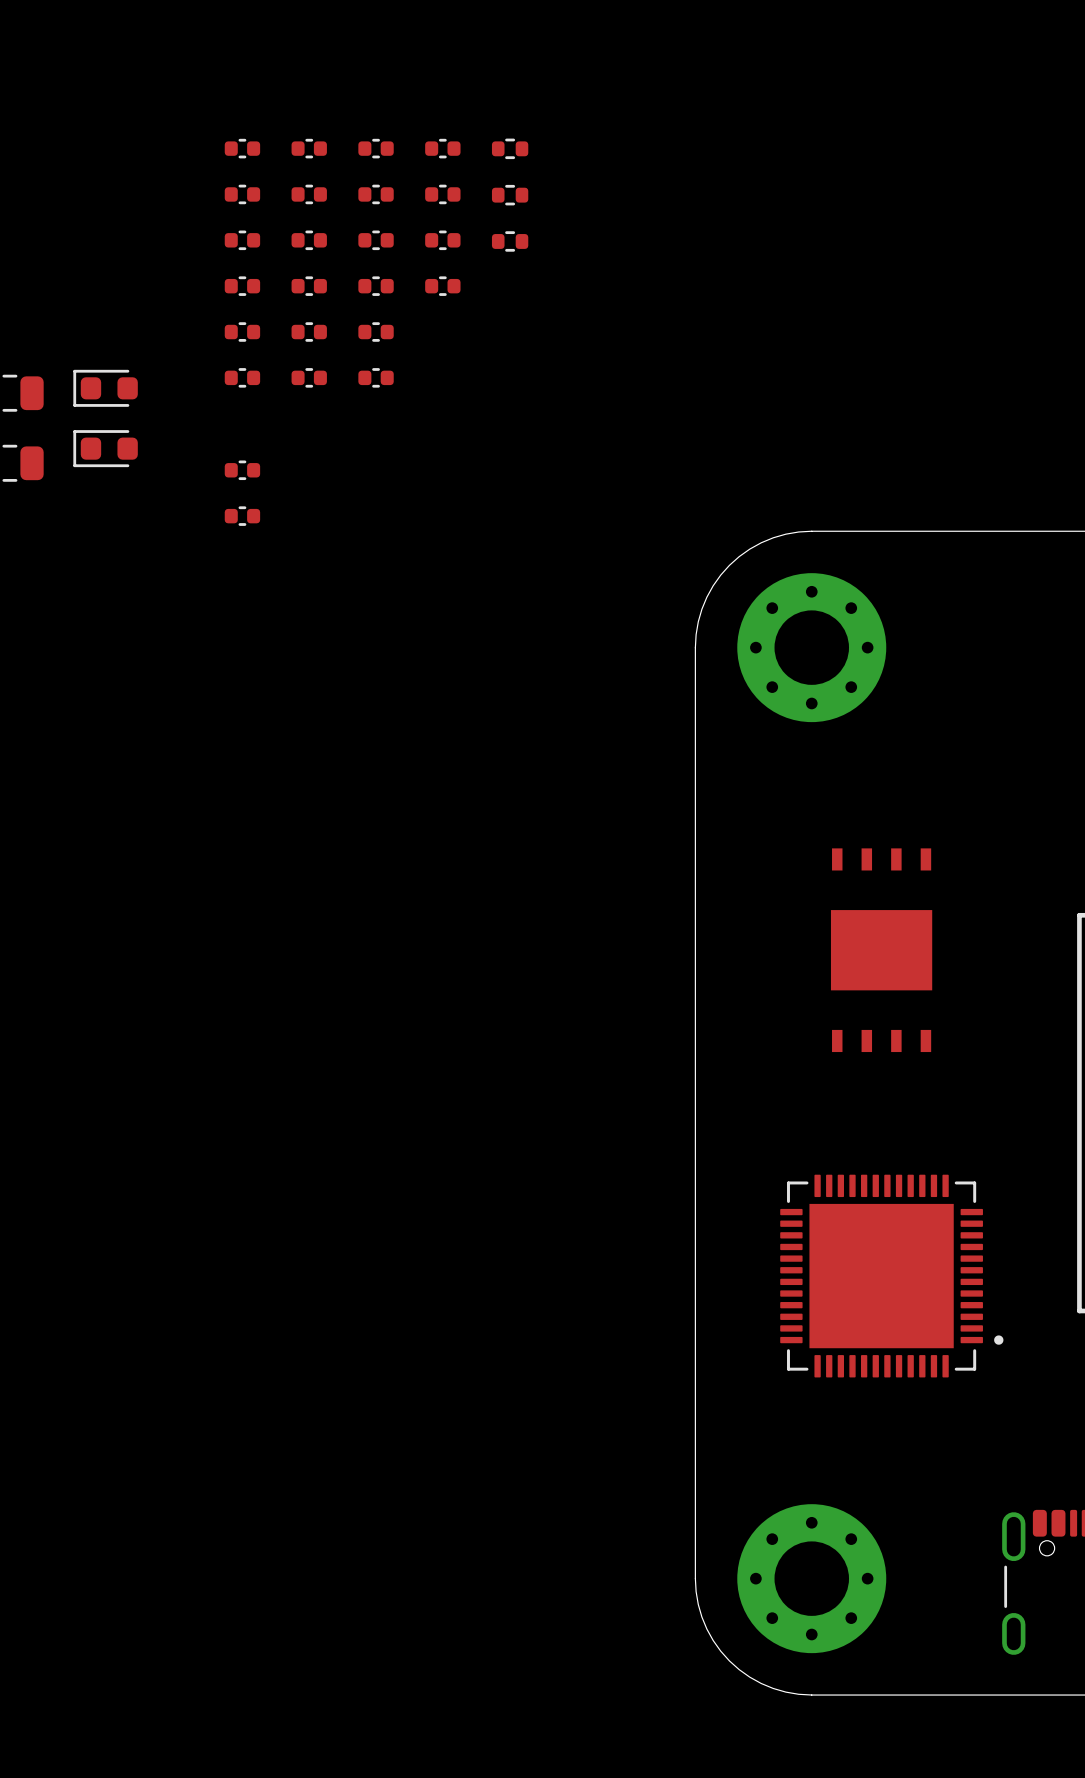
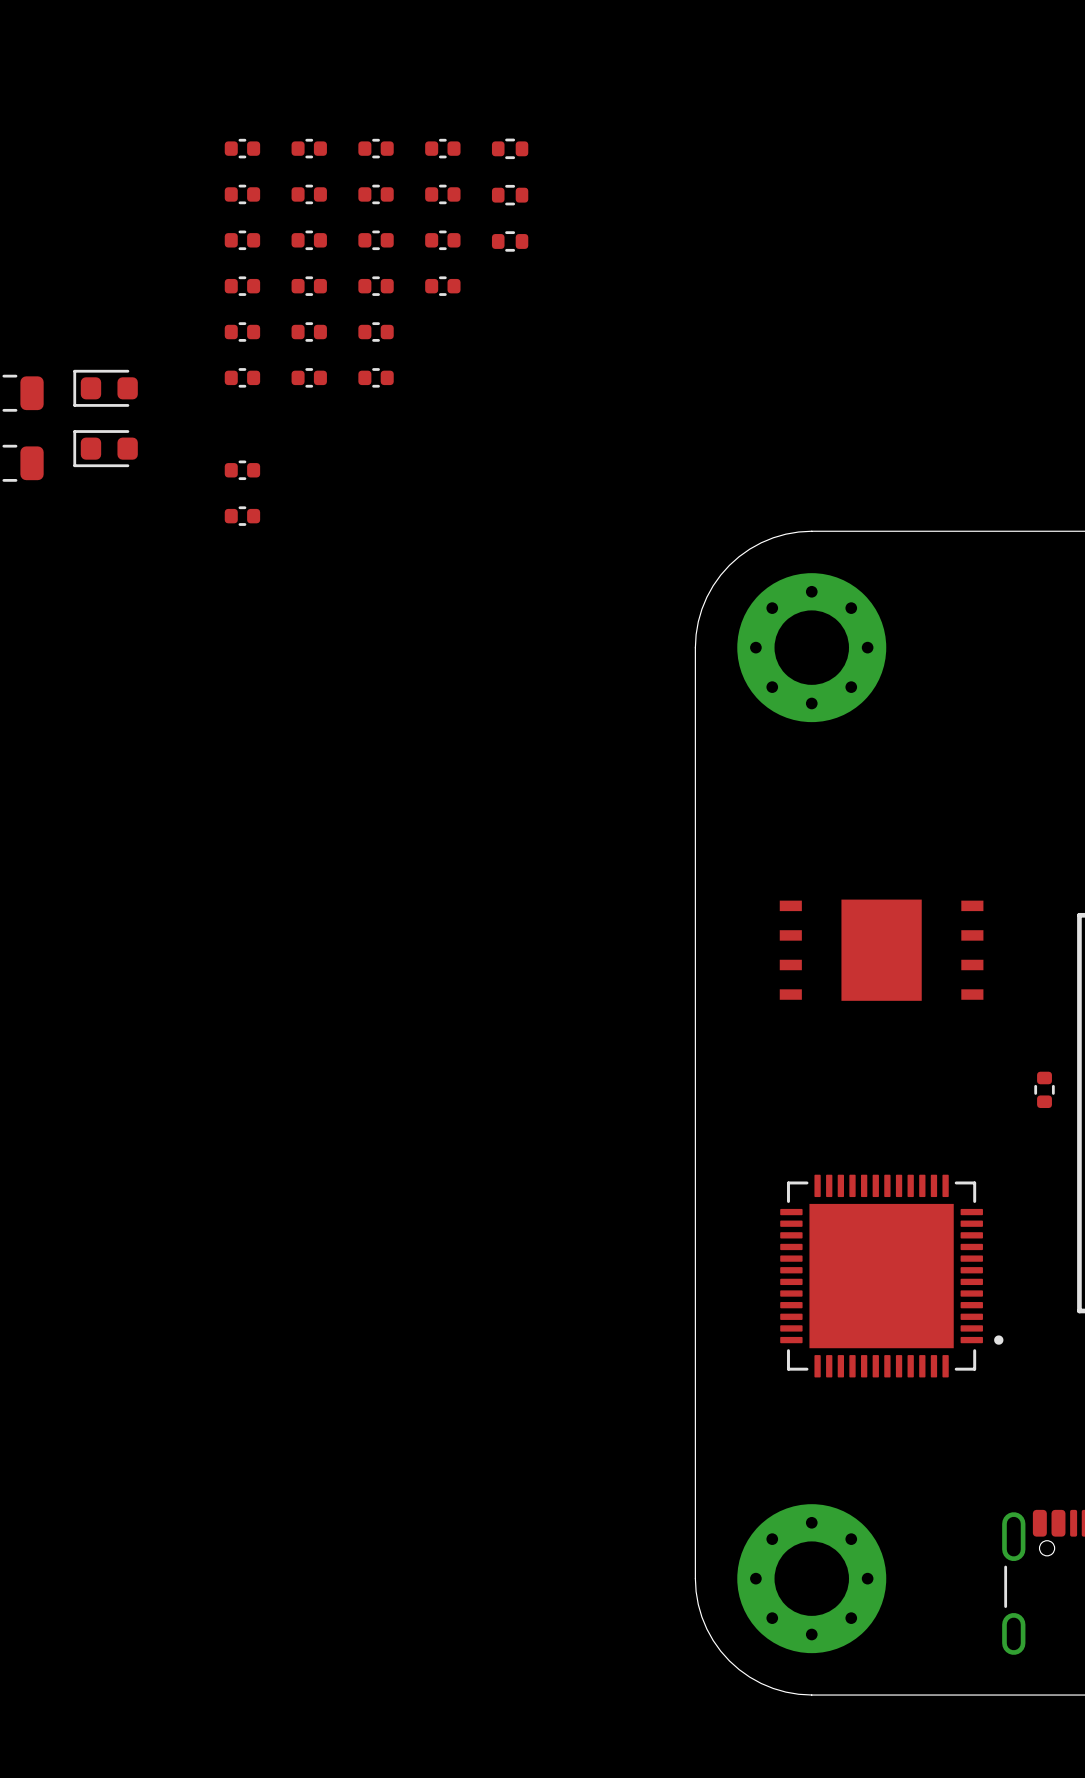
part rotation: 0° (881, 950) -> 90° clockwise (881, 950)
part: none -> (1044, 1089)

